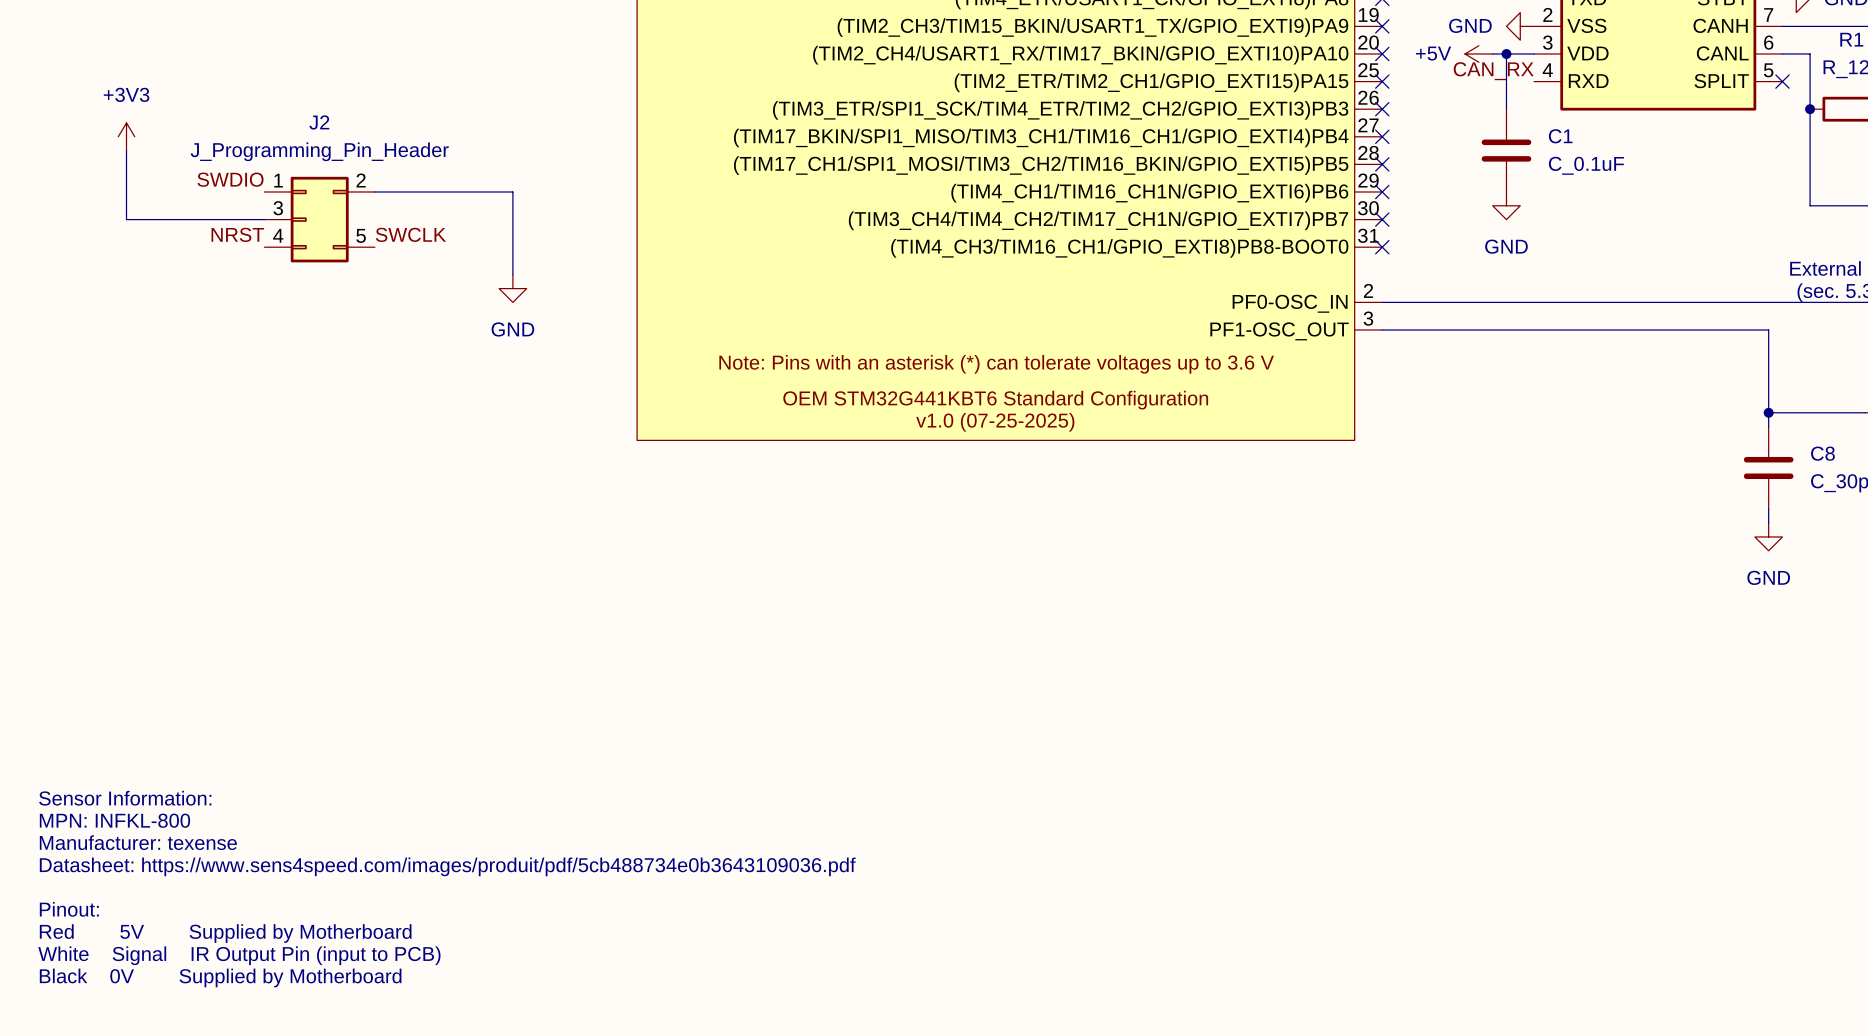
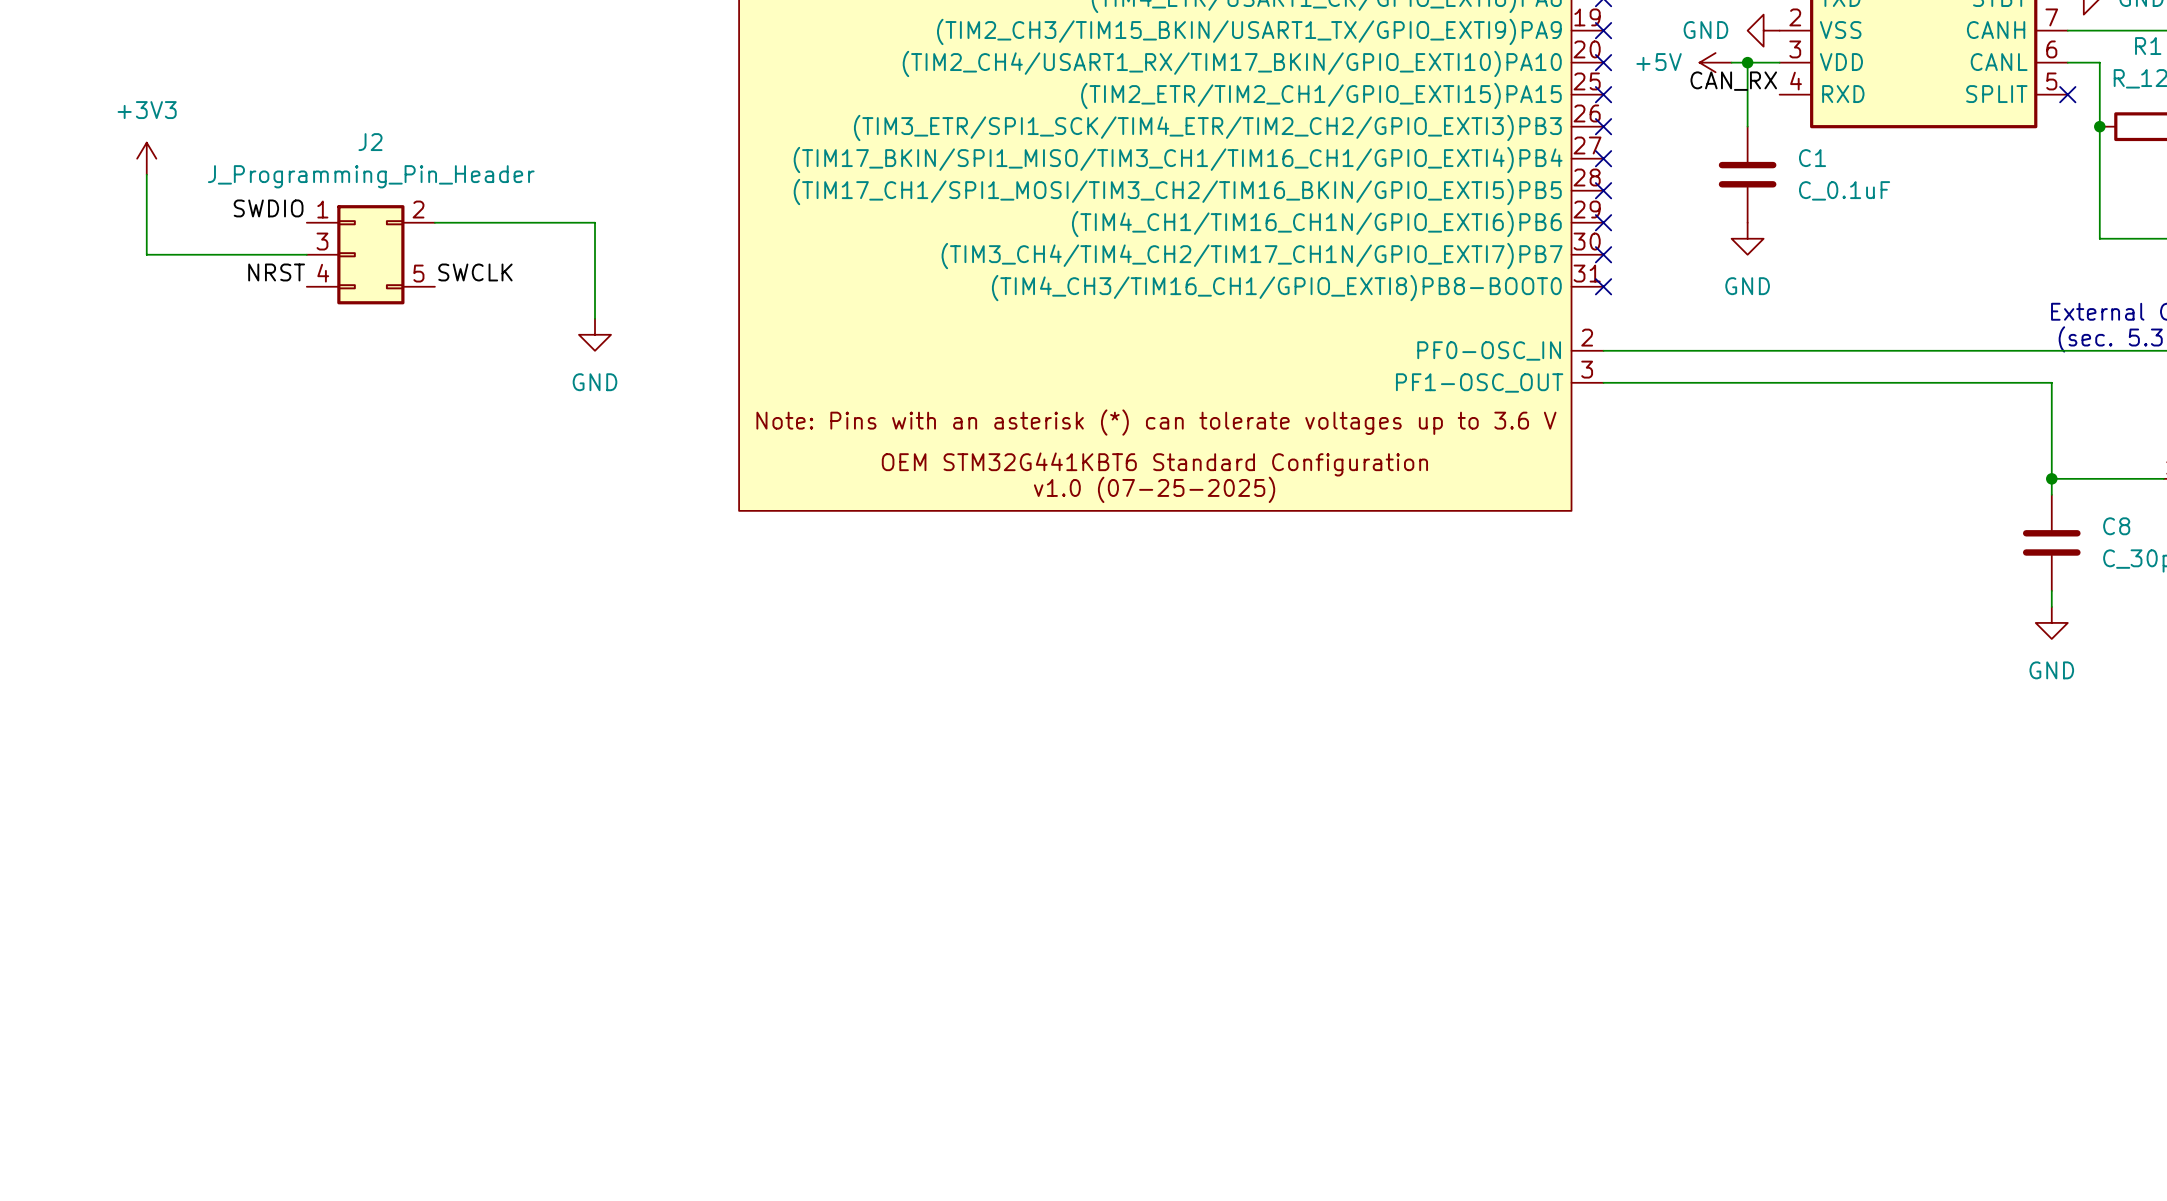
text: Sensor Information: (125, 798) -> none
text: MPN: INFKL-800 (114, 820) -> none
text: Manufacturer: texense (138, 842) -> none
text: Datasheet: https://www.sens4speed.com/images/produit/pdf/5cb488734e0b3643109036.pdf (447, 866) -> none
text: Pinout: (69, 909) -> none
text: Red 5V Supplied by Motherboard (225, 933) -> none
text: White Signal IR Output Pin (input to PCB) (239, 955) -> none
text: Black 0V Supplied by Motherboard (220, 977) -> none

